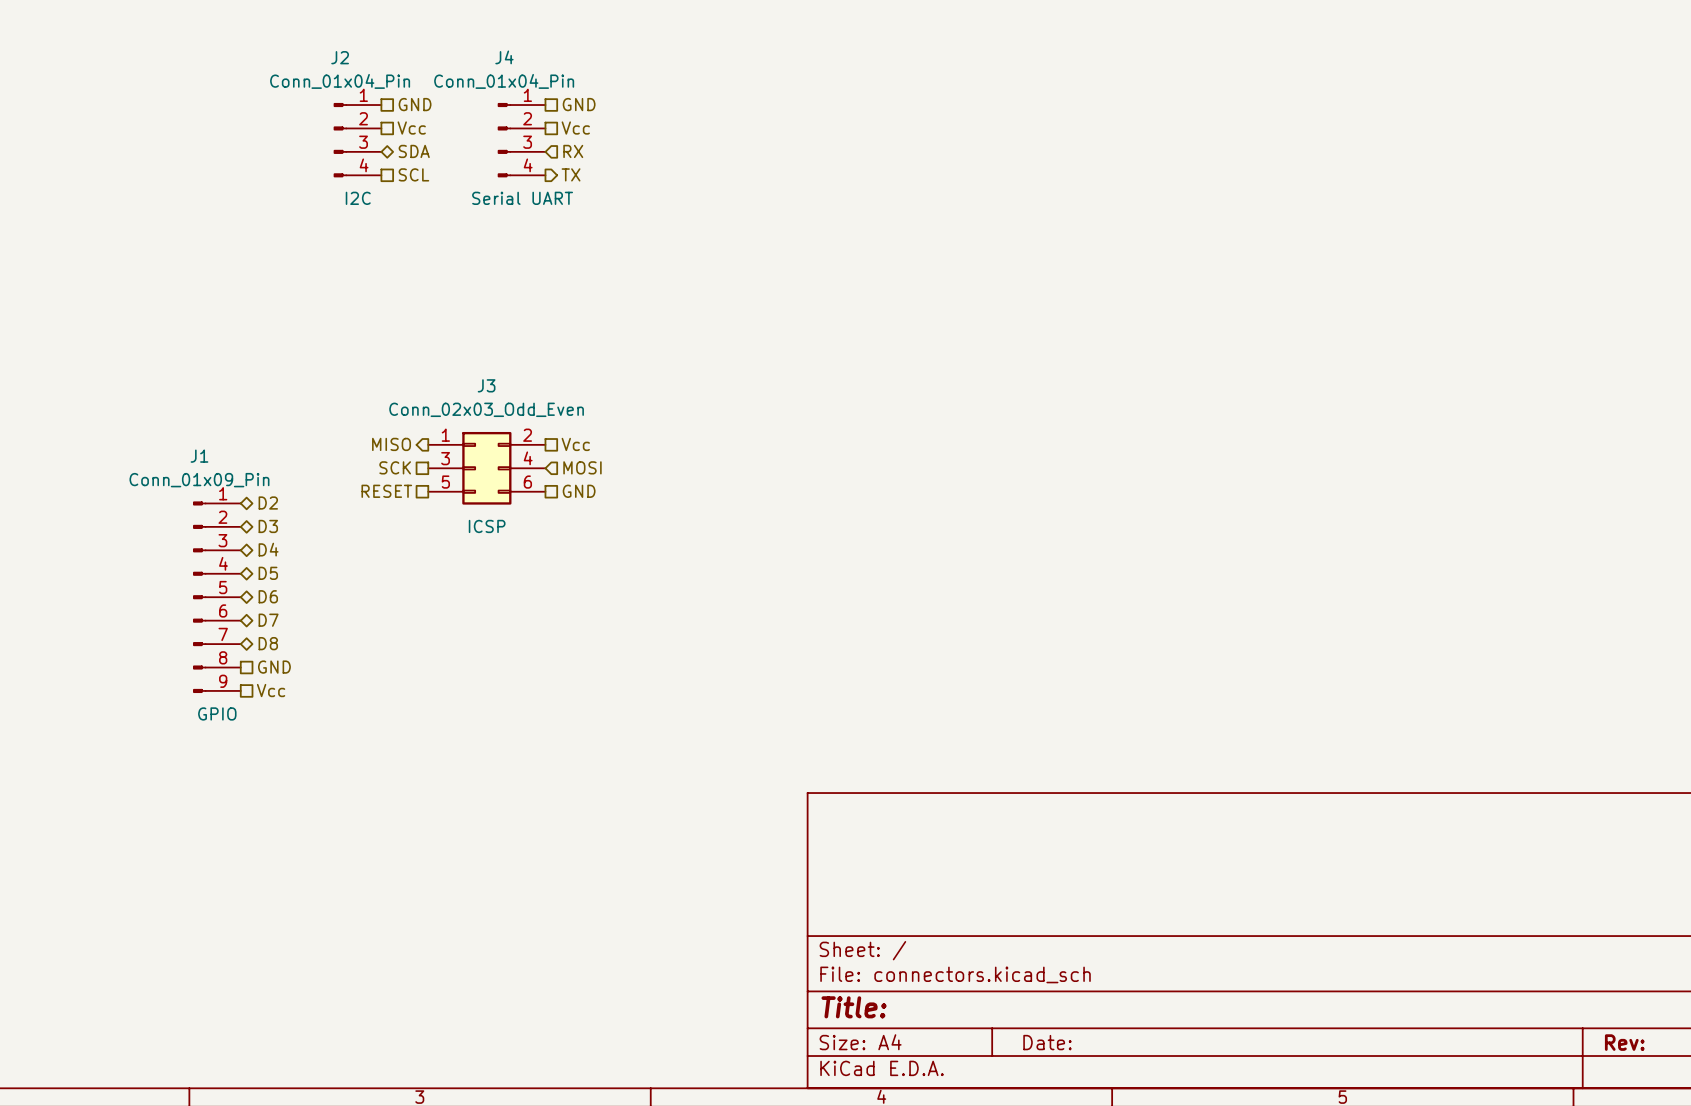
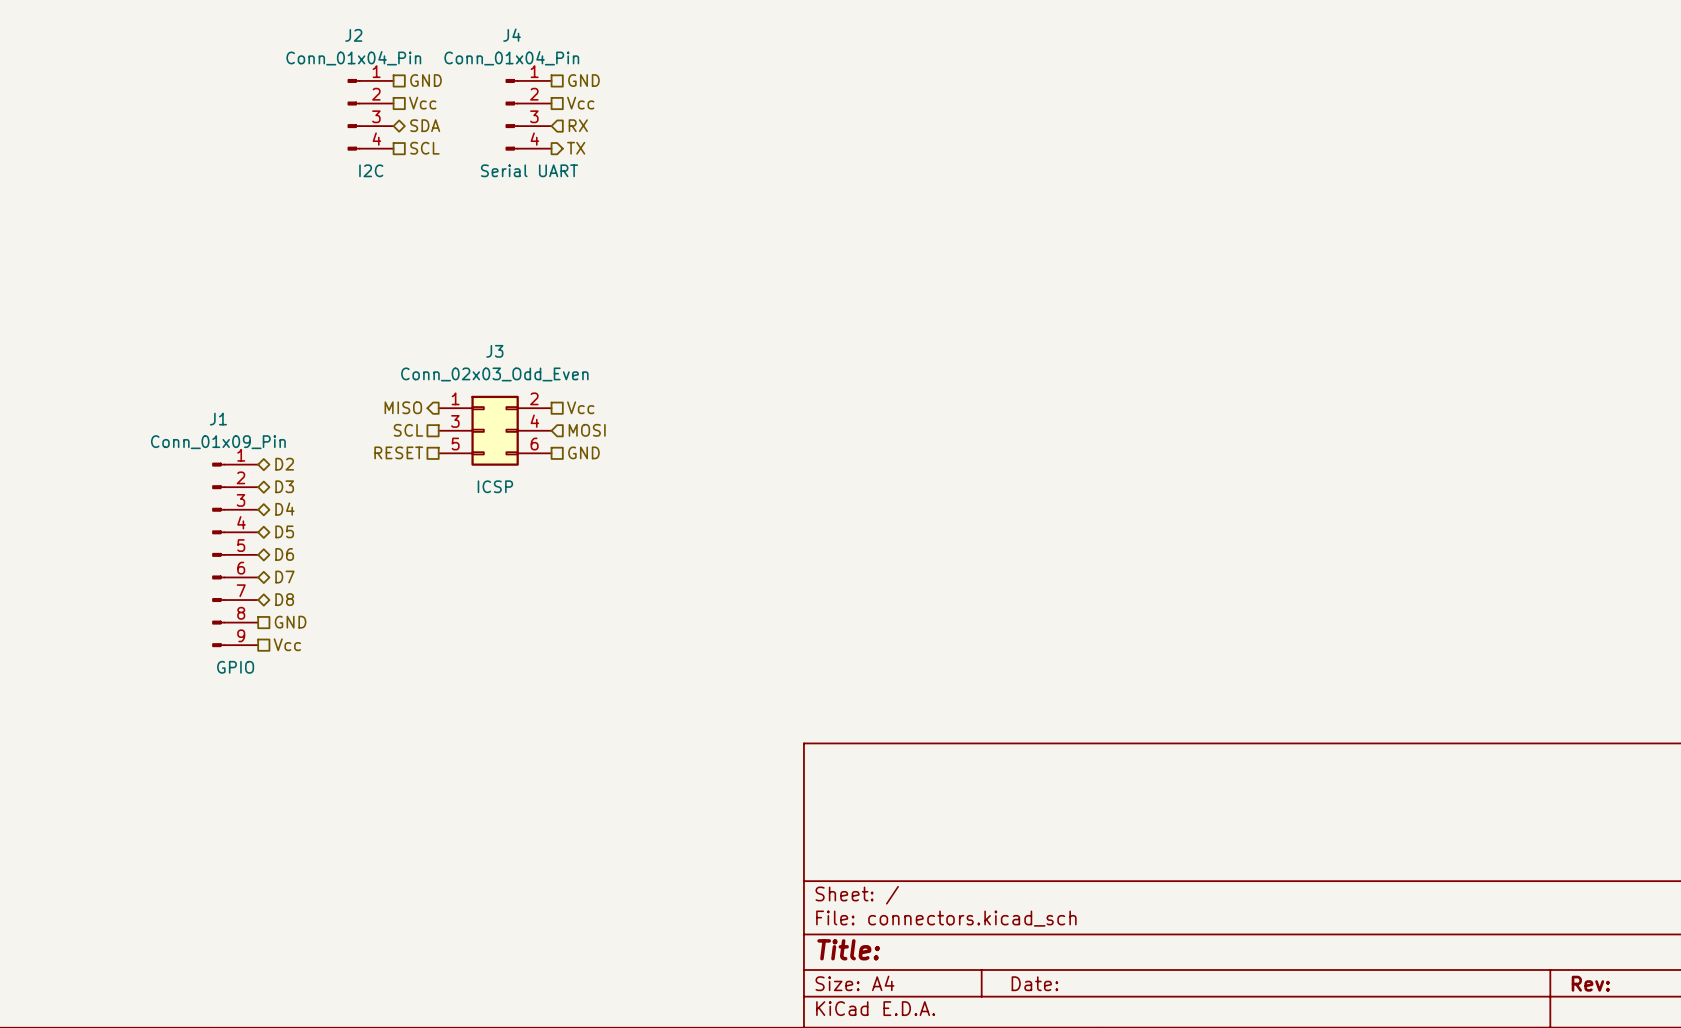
hierarchical label: SCK (395, 467) -> SCL (408, 430)

